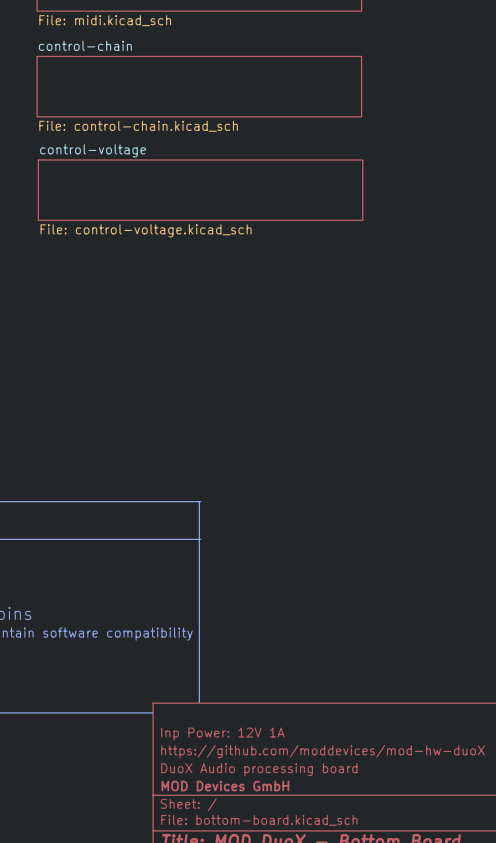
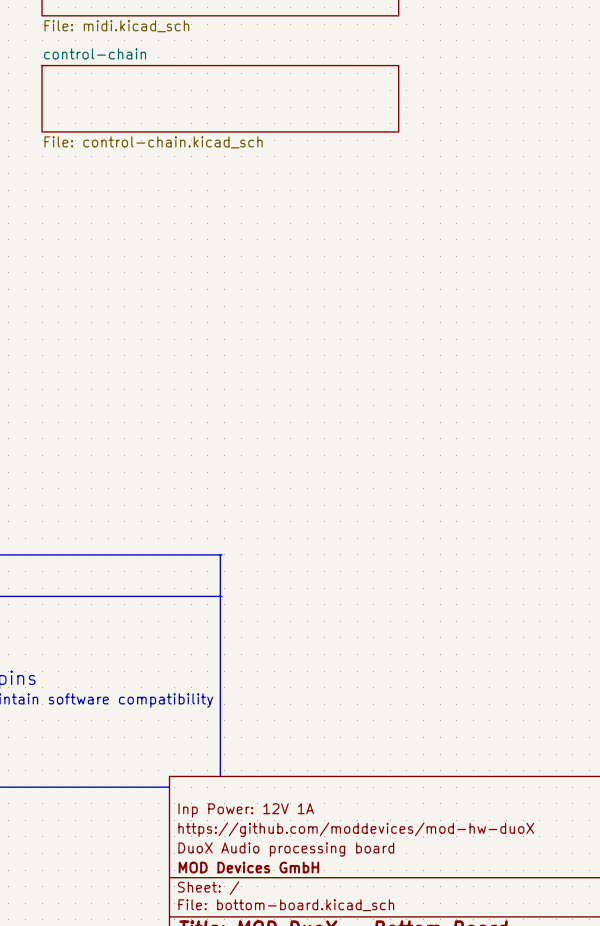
sheet control-voltage: File: control-voltage.kicad_sch (200, 190) -> none

